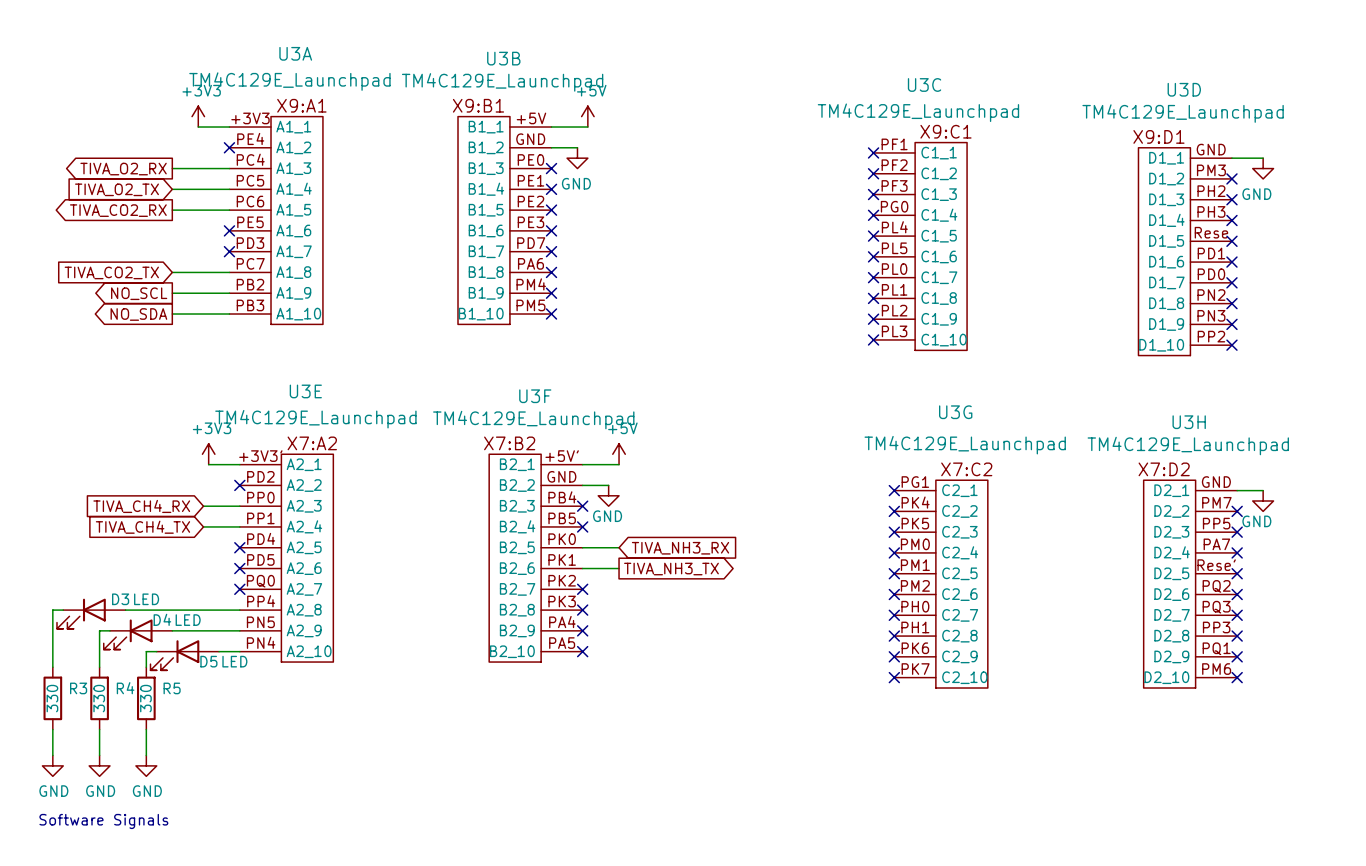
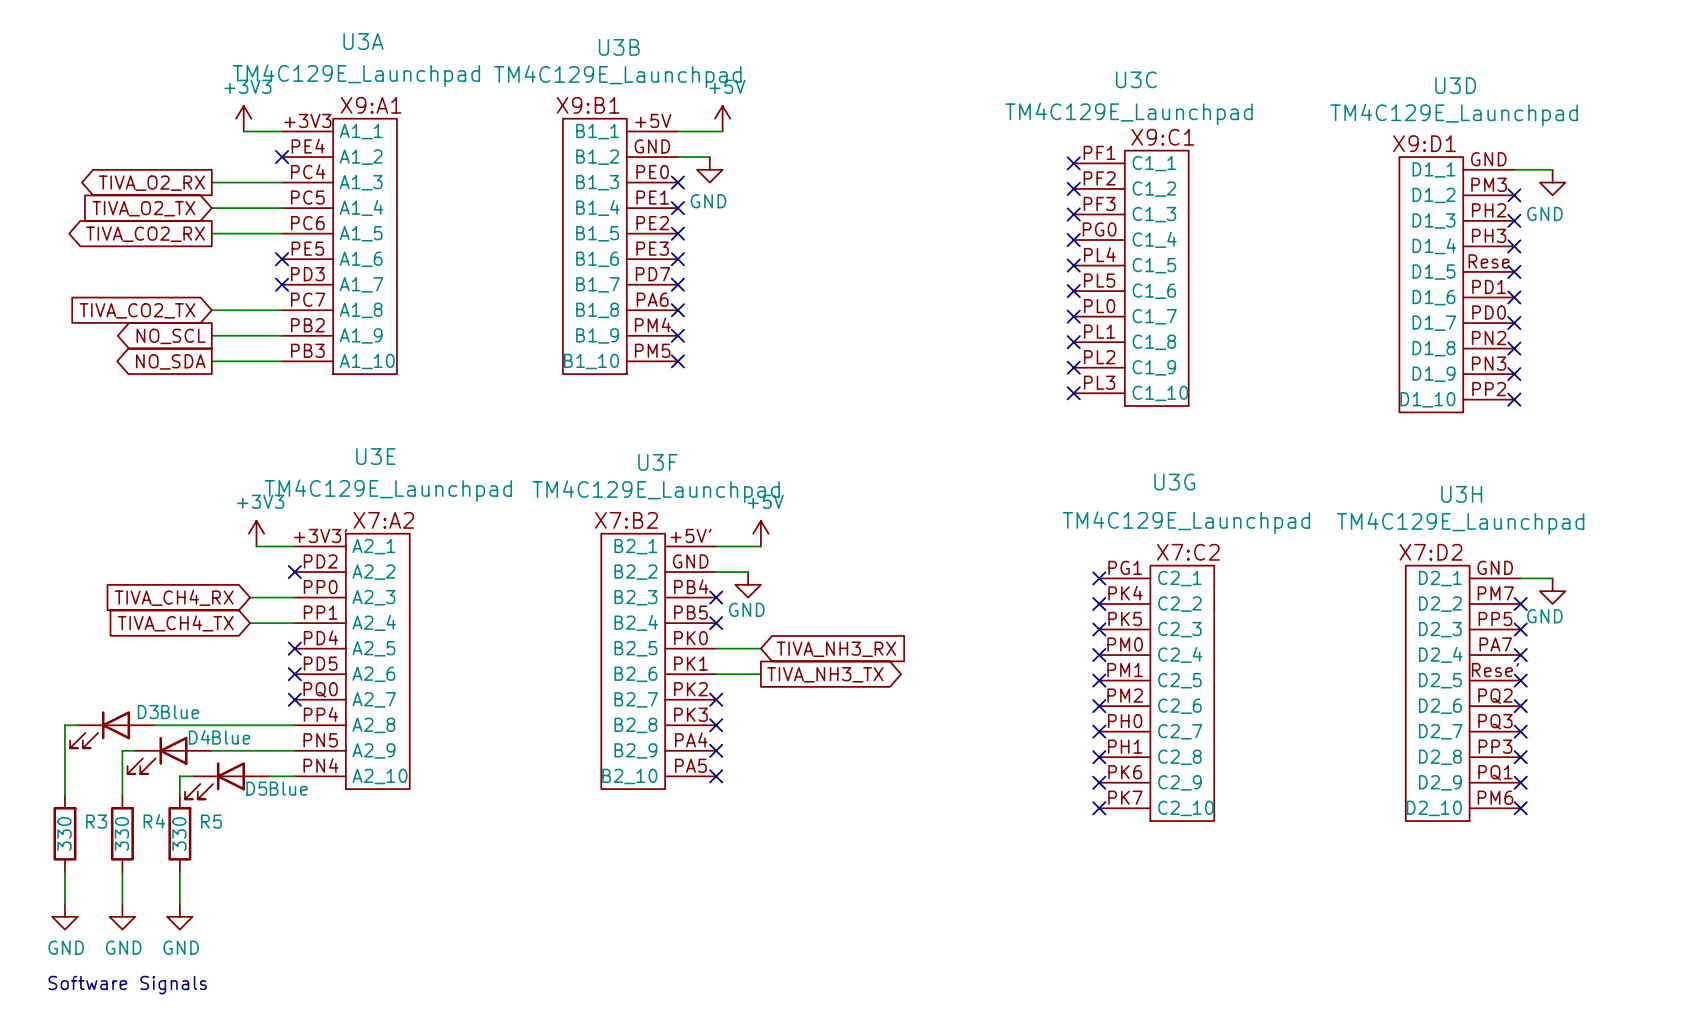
D3 value: LED (146, 599) -> Blue (180, 712)
D4 value: LED (188, 620) -> Blue (231, 737)
D5 value: LED (234, 661) -> Blue (288, 788)

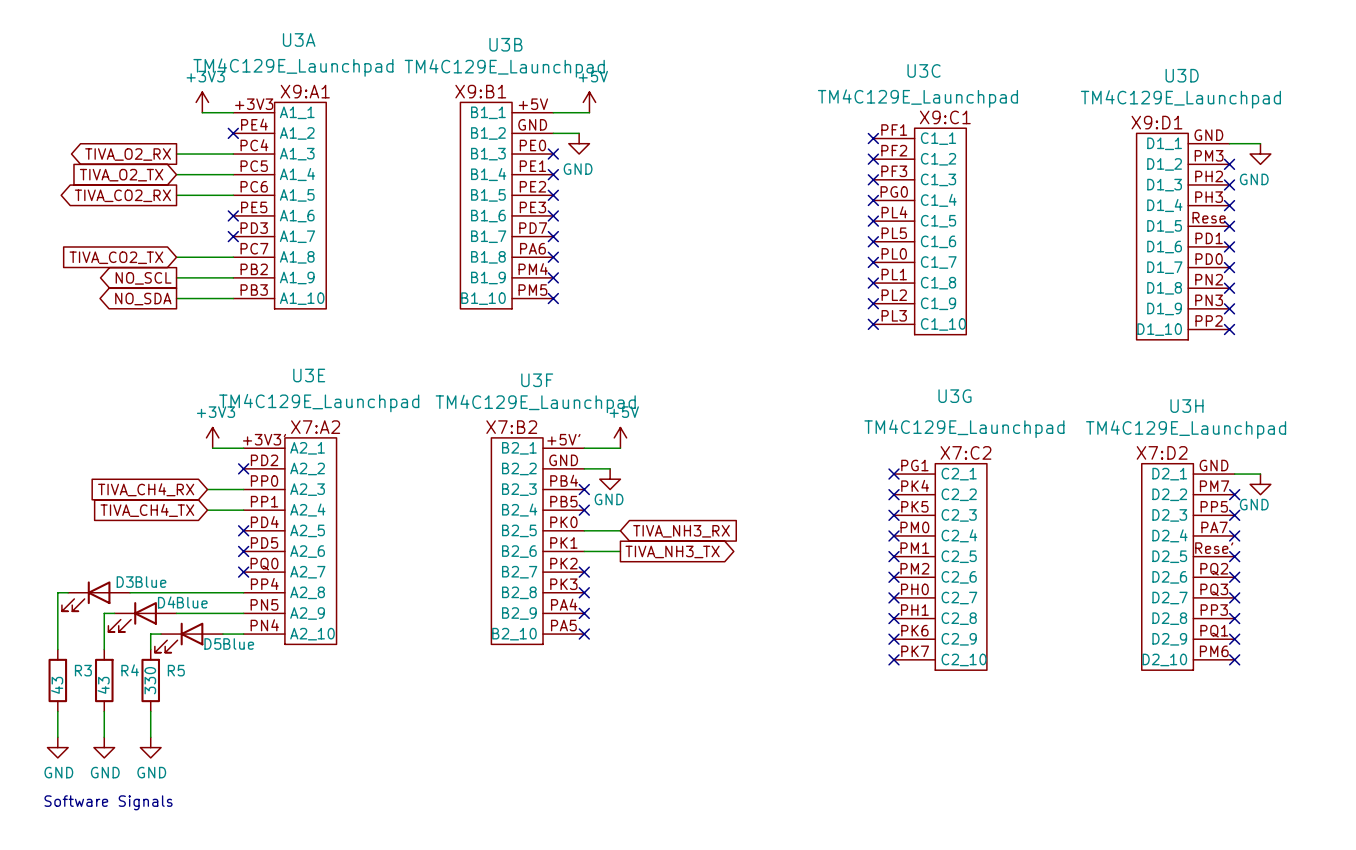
R3 value: 330 (64, 834) -> 43 (57, 685)
R4 value: 330 (121, 834) -> 43 (103, 685)

